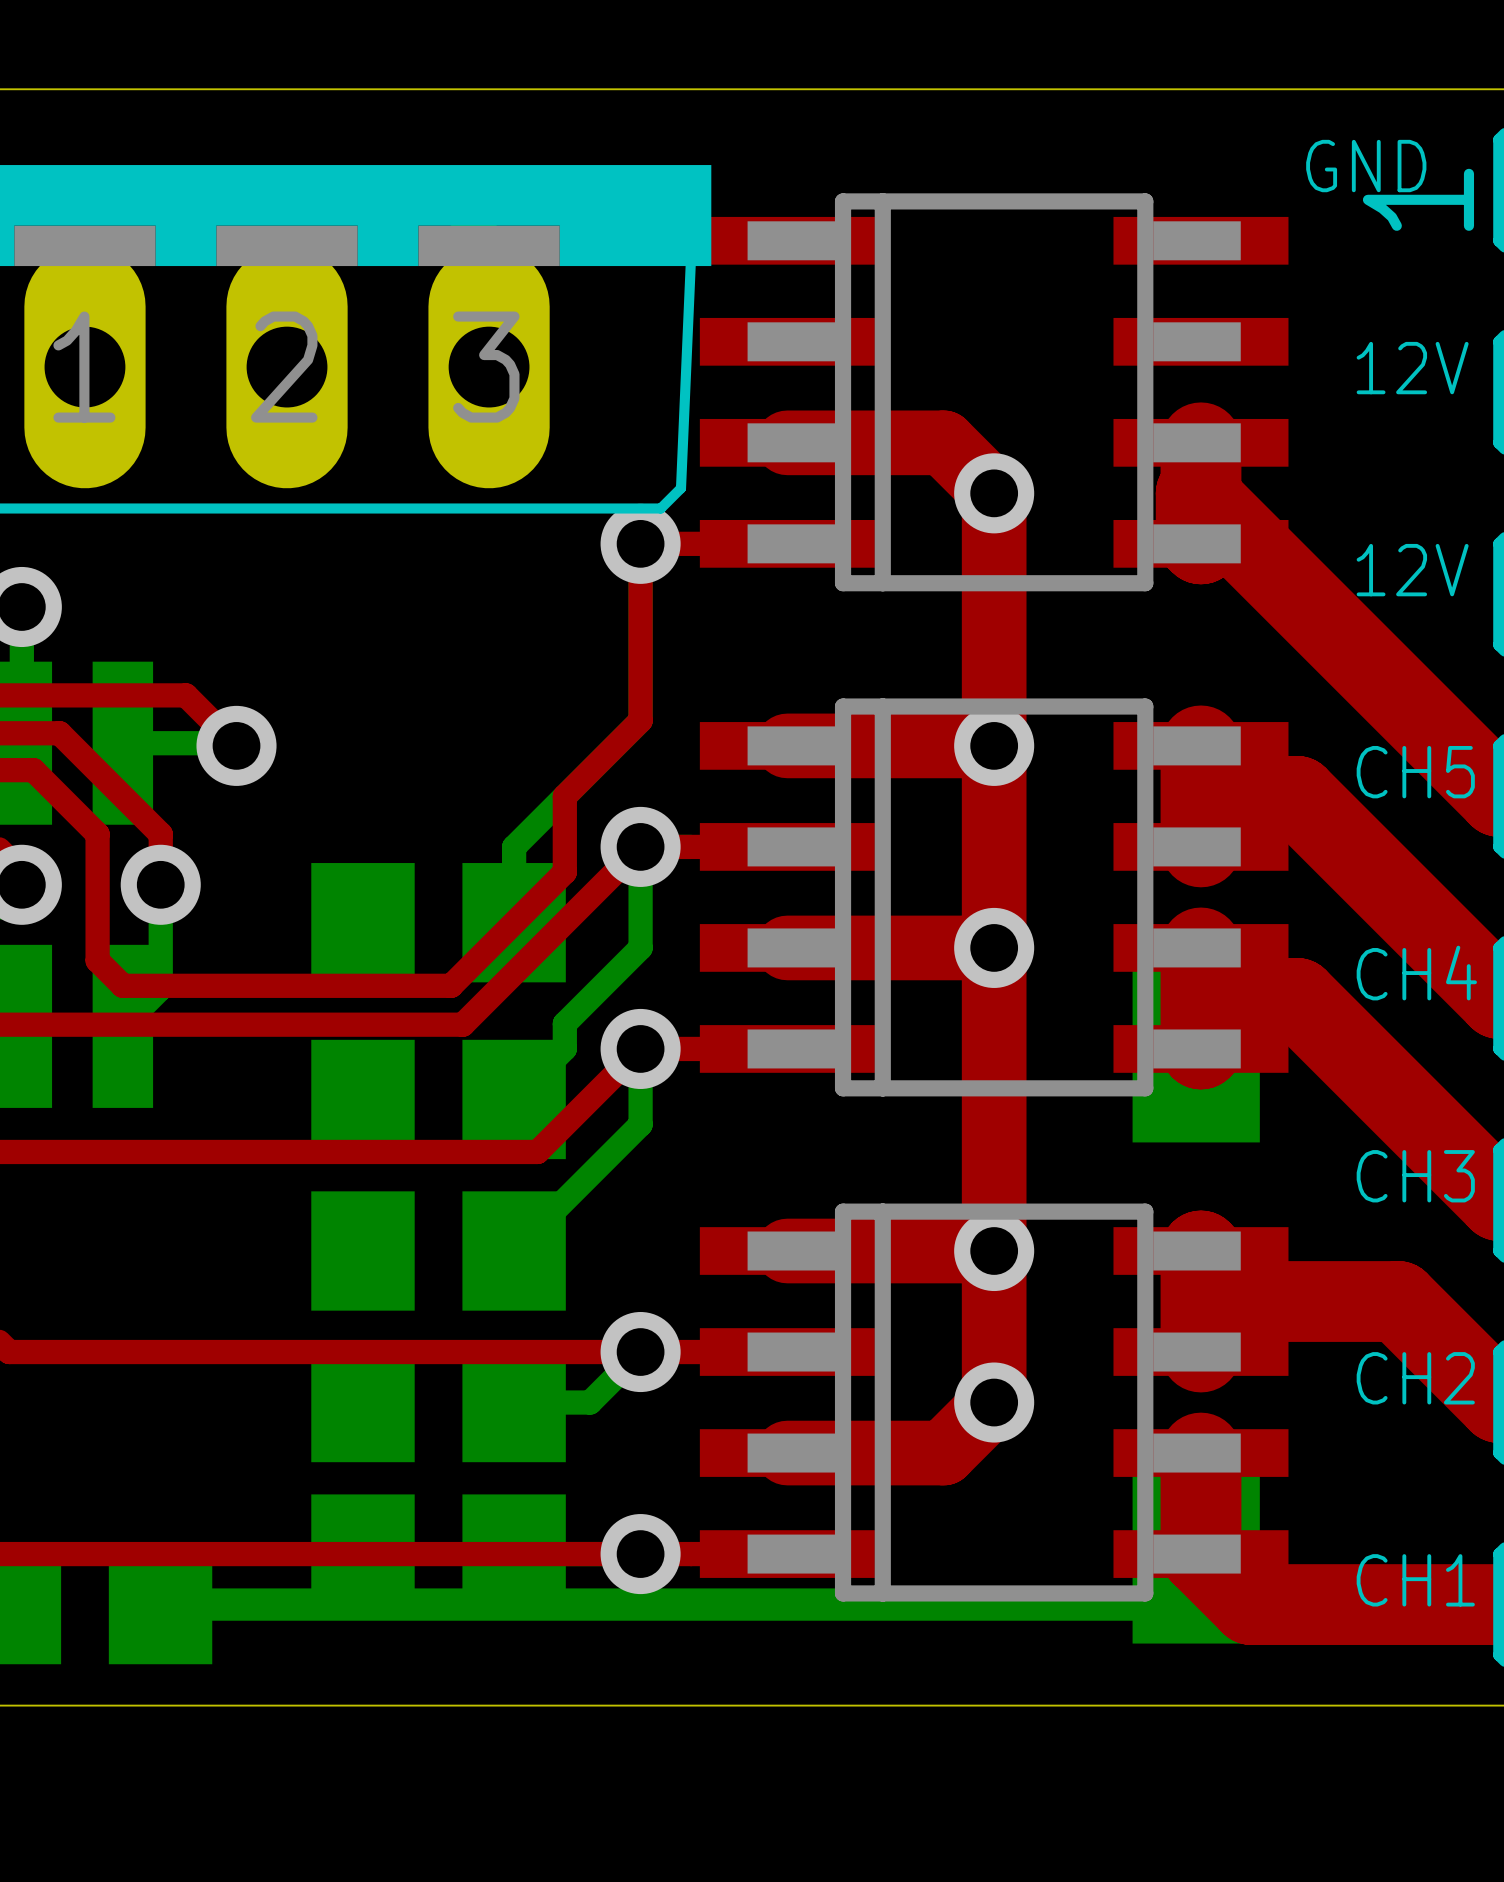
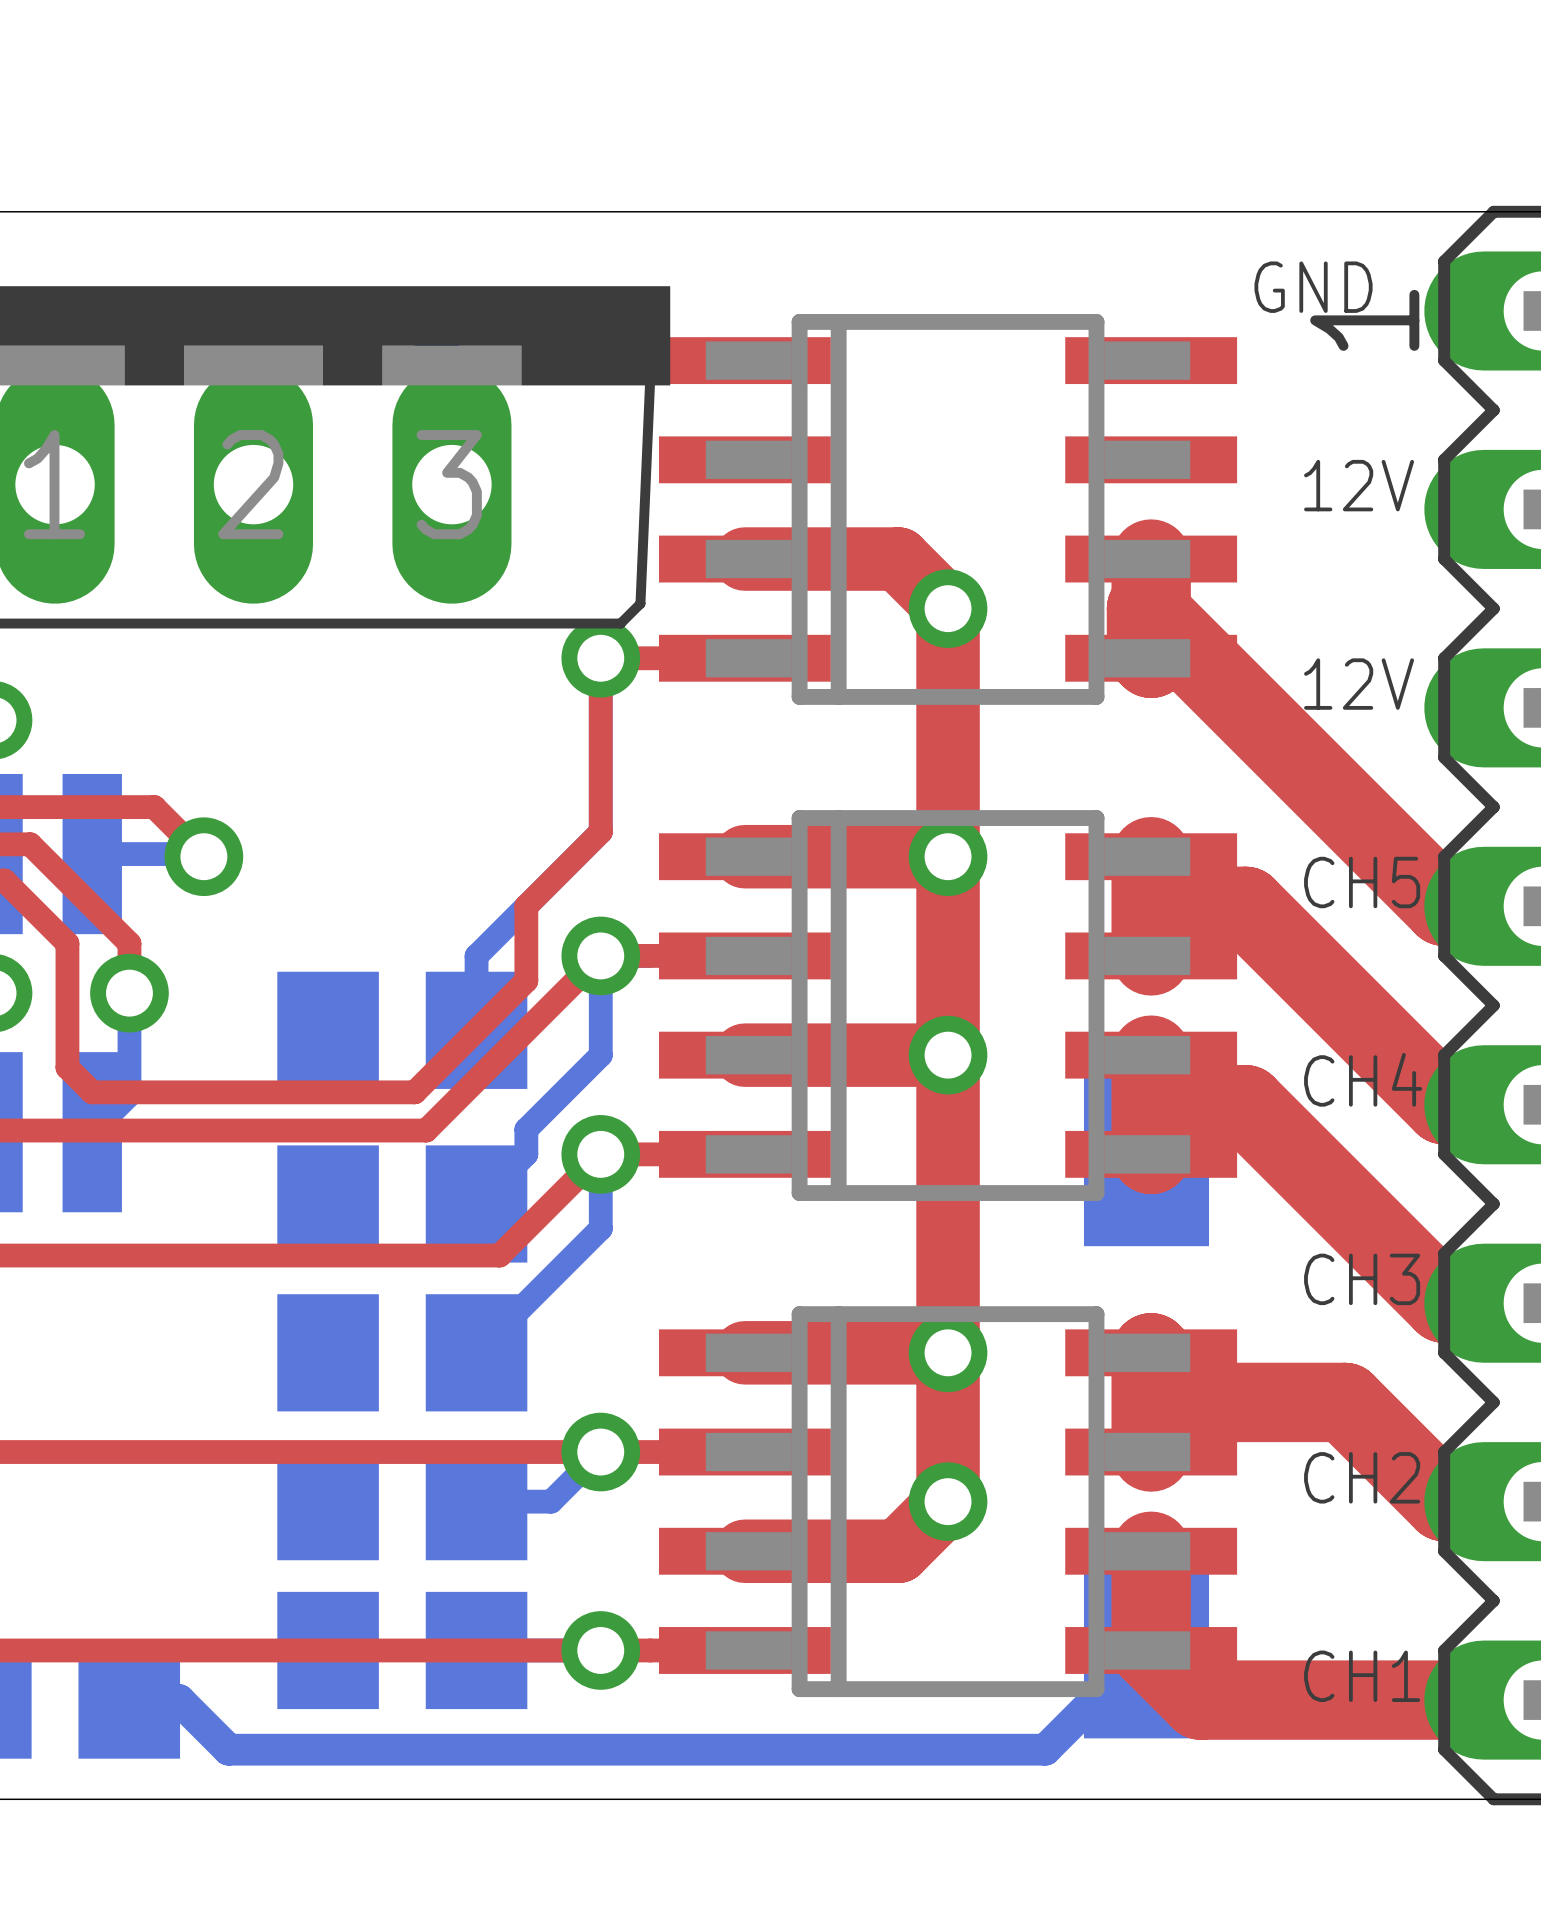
bottom track: (211, 1604) (1143, 1604) -> (179, 1700) (228, 1749) (1045, 1749) (1094, 1700)

